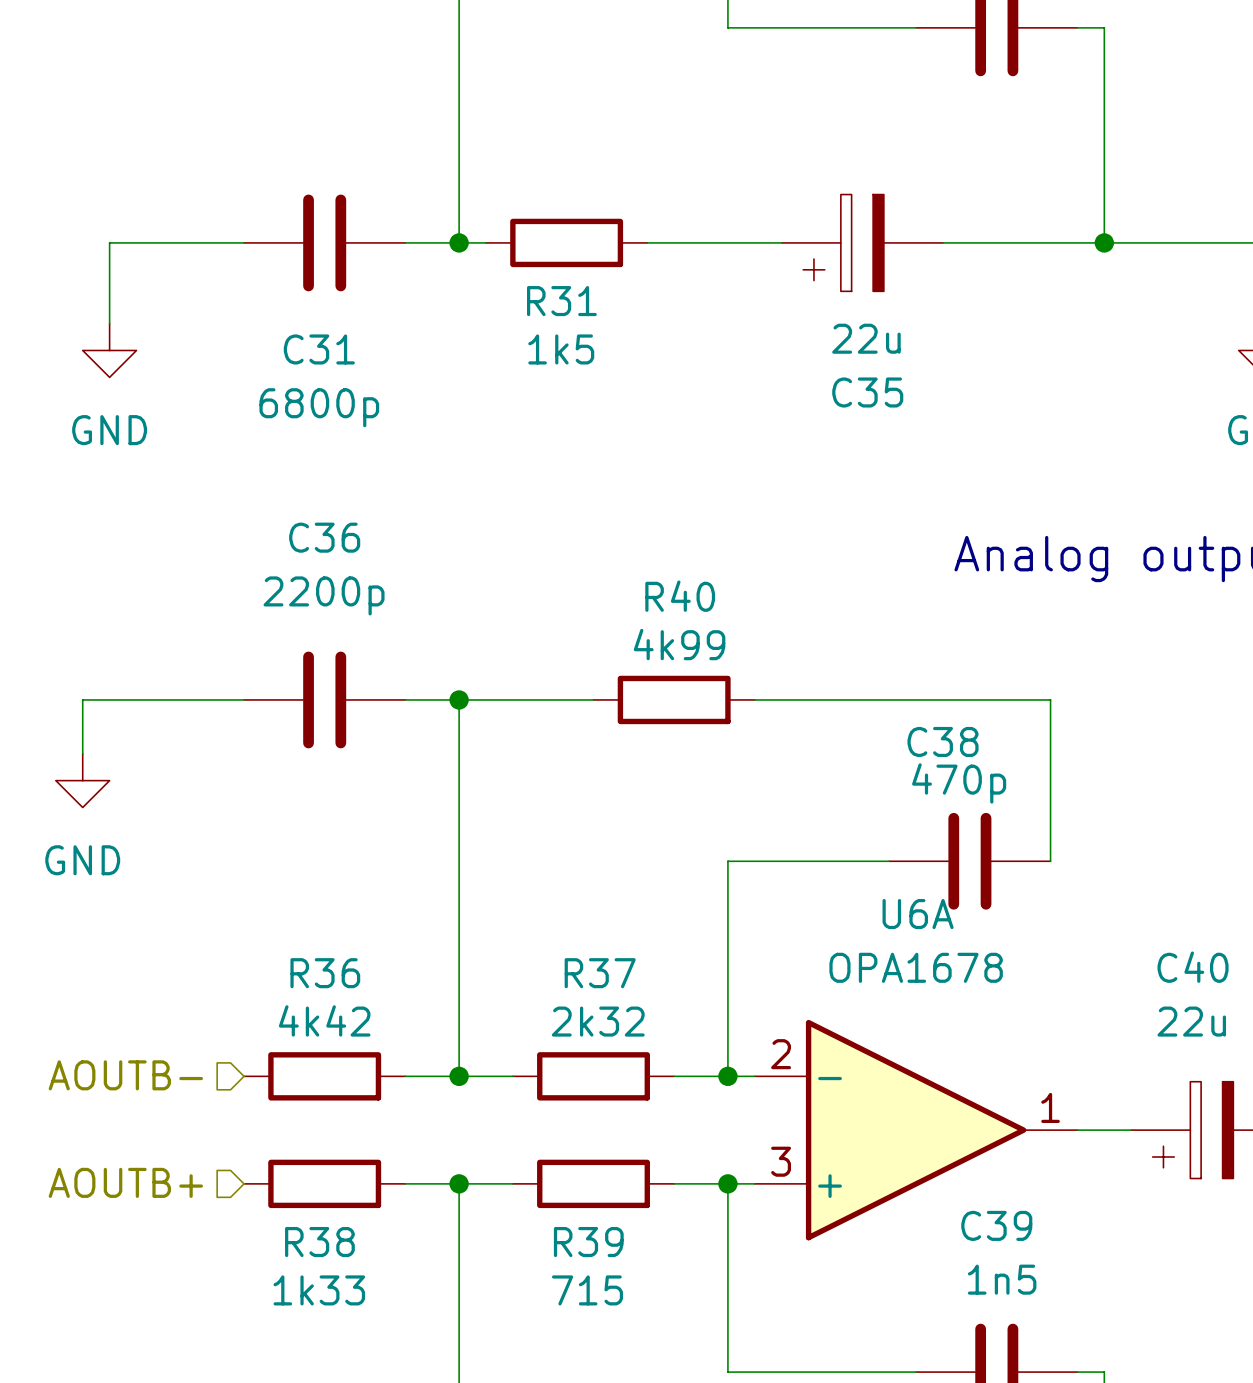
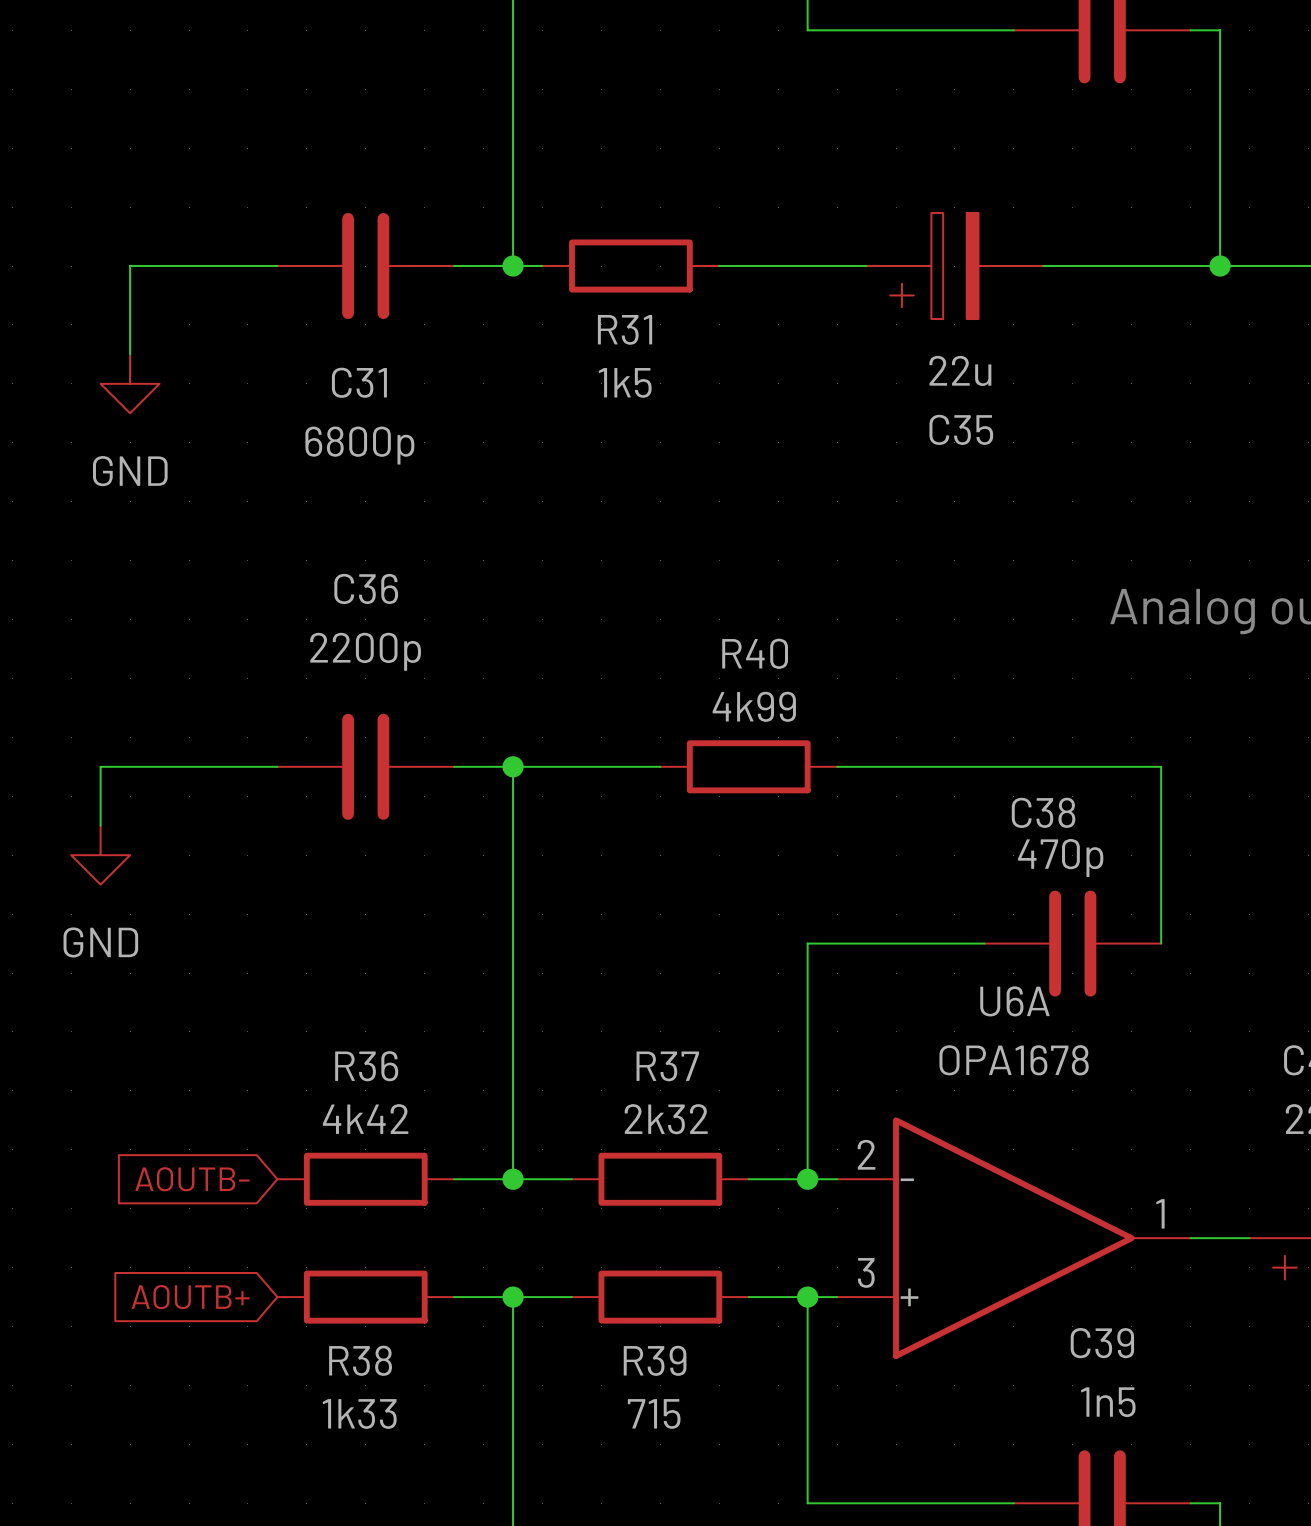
hierarchical label: AOUTB- (125, 1075) -> none
global label: none -> AOUTB- (192, 1179)
hierarchical label: AOUTB+ (125, 1182) -> none
global label: none -> AOUTB+ (190, 1297)

